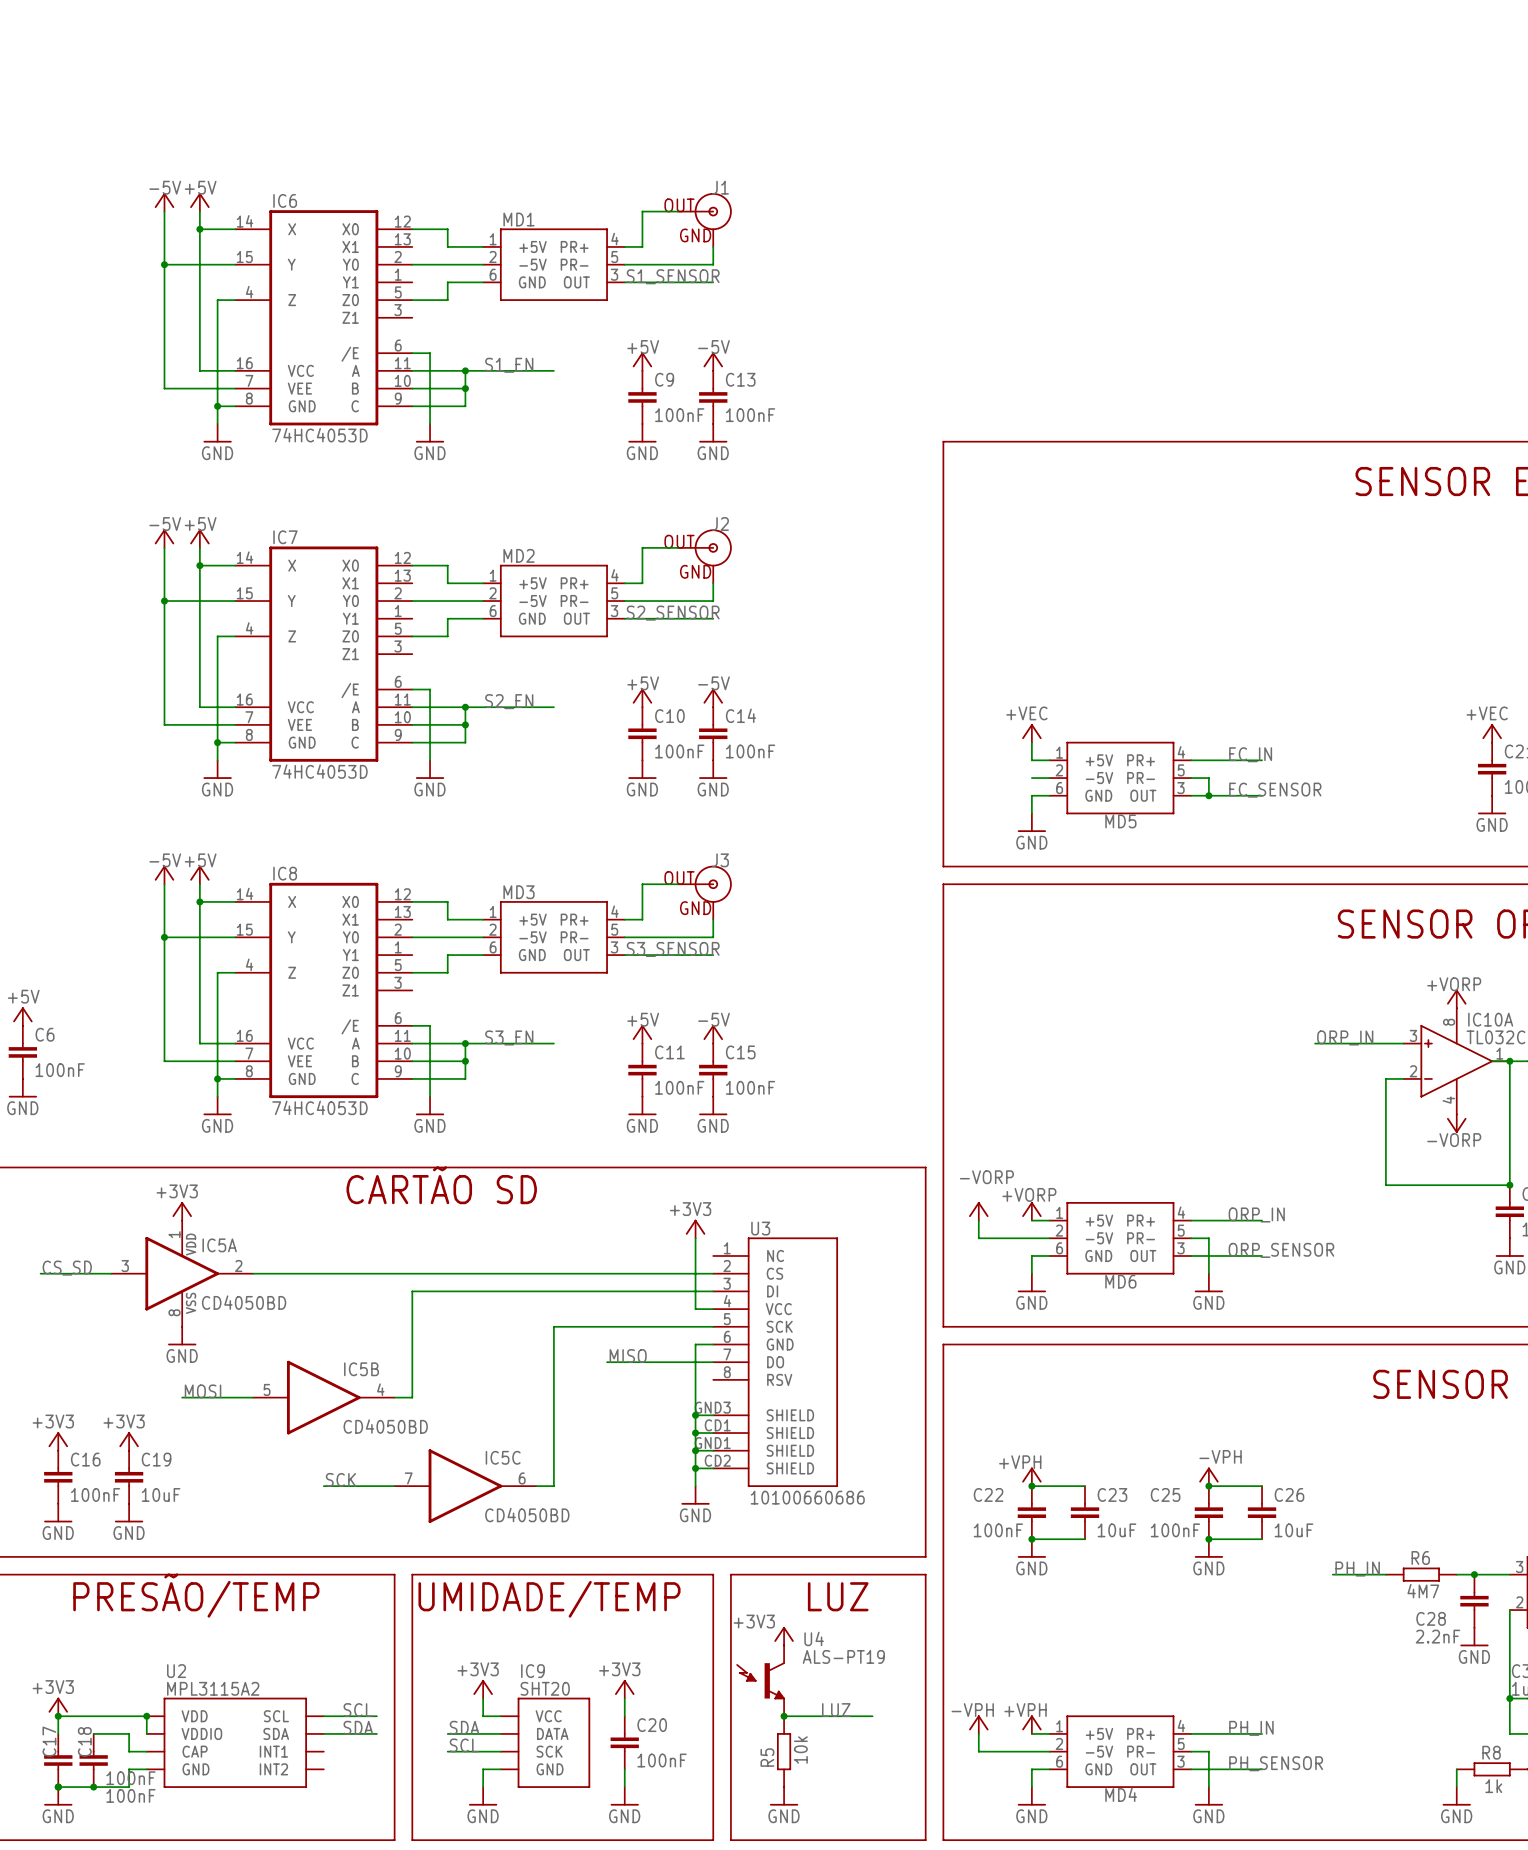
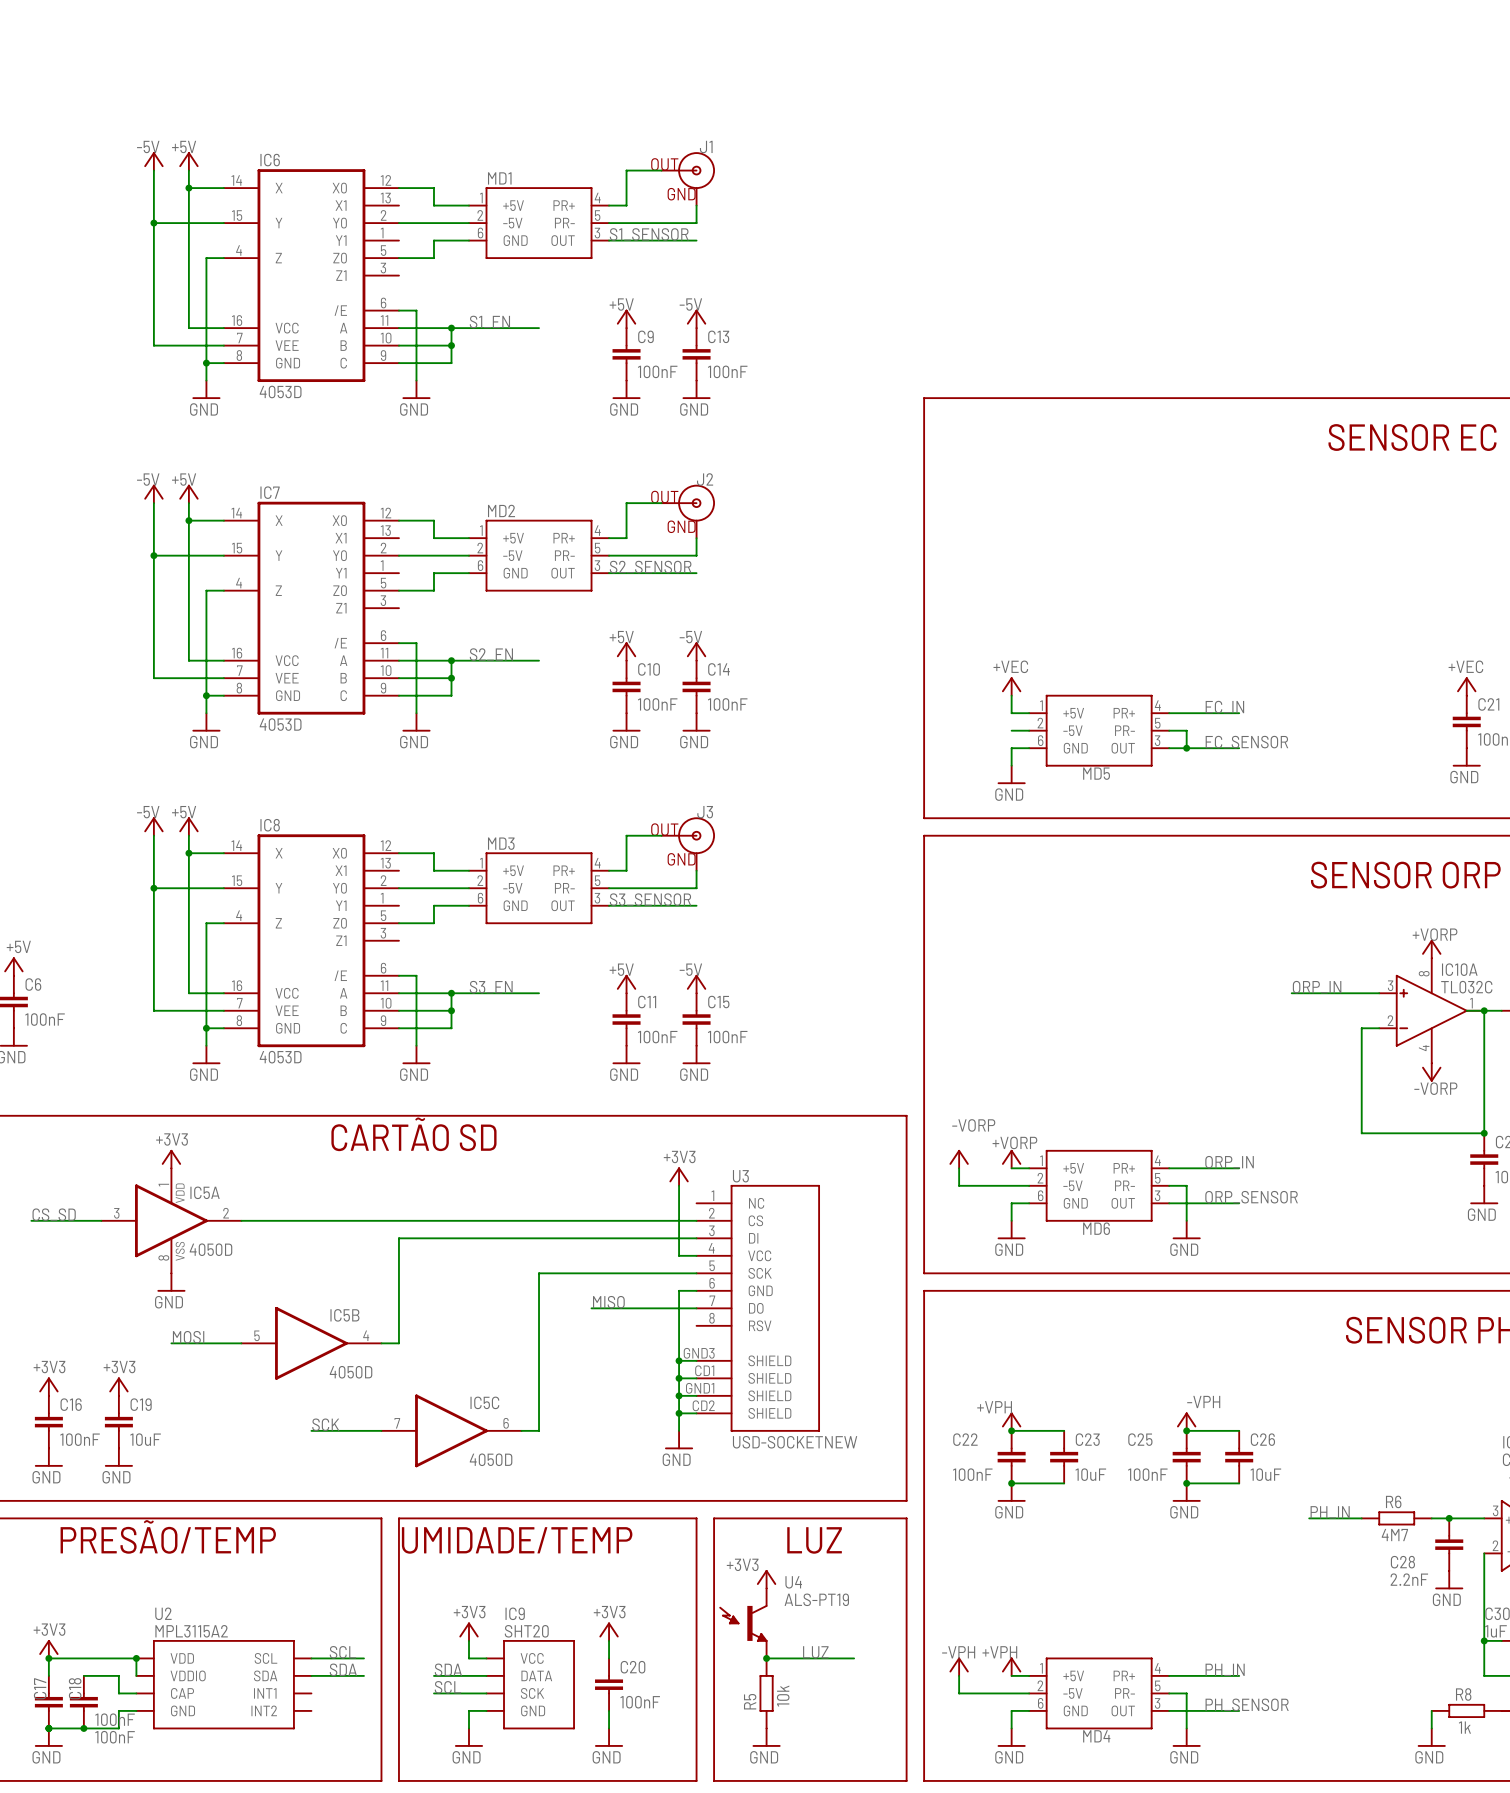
IC6 value: 74HC4053D (319, 435) -> 4053D (280, 392)
IC7 value: 74HC4053D (319, 771) -> 4053D (280, 724)
IC8 value: 74HC4053D (319, 1107) -> 4053D (280, 1057)
IC5A value: CD4050BD (244, 1302) -> 4050D (210, 1249)
IC5B value: CD4050BD (385, 1426) -> 4050D (351, 1372)
U3 value: 10100660686 (807, 1497) -> USD-SOCKETNEW (795, 1442)
IC5C value: CD4050BD (527, 1515) -> 4050D (491, 1459)

